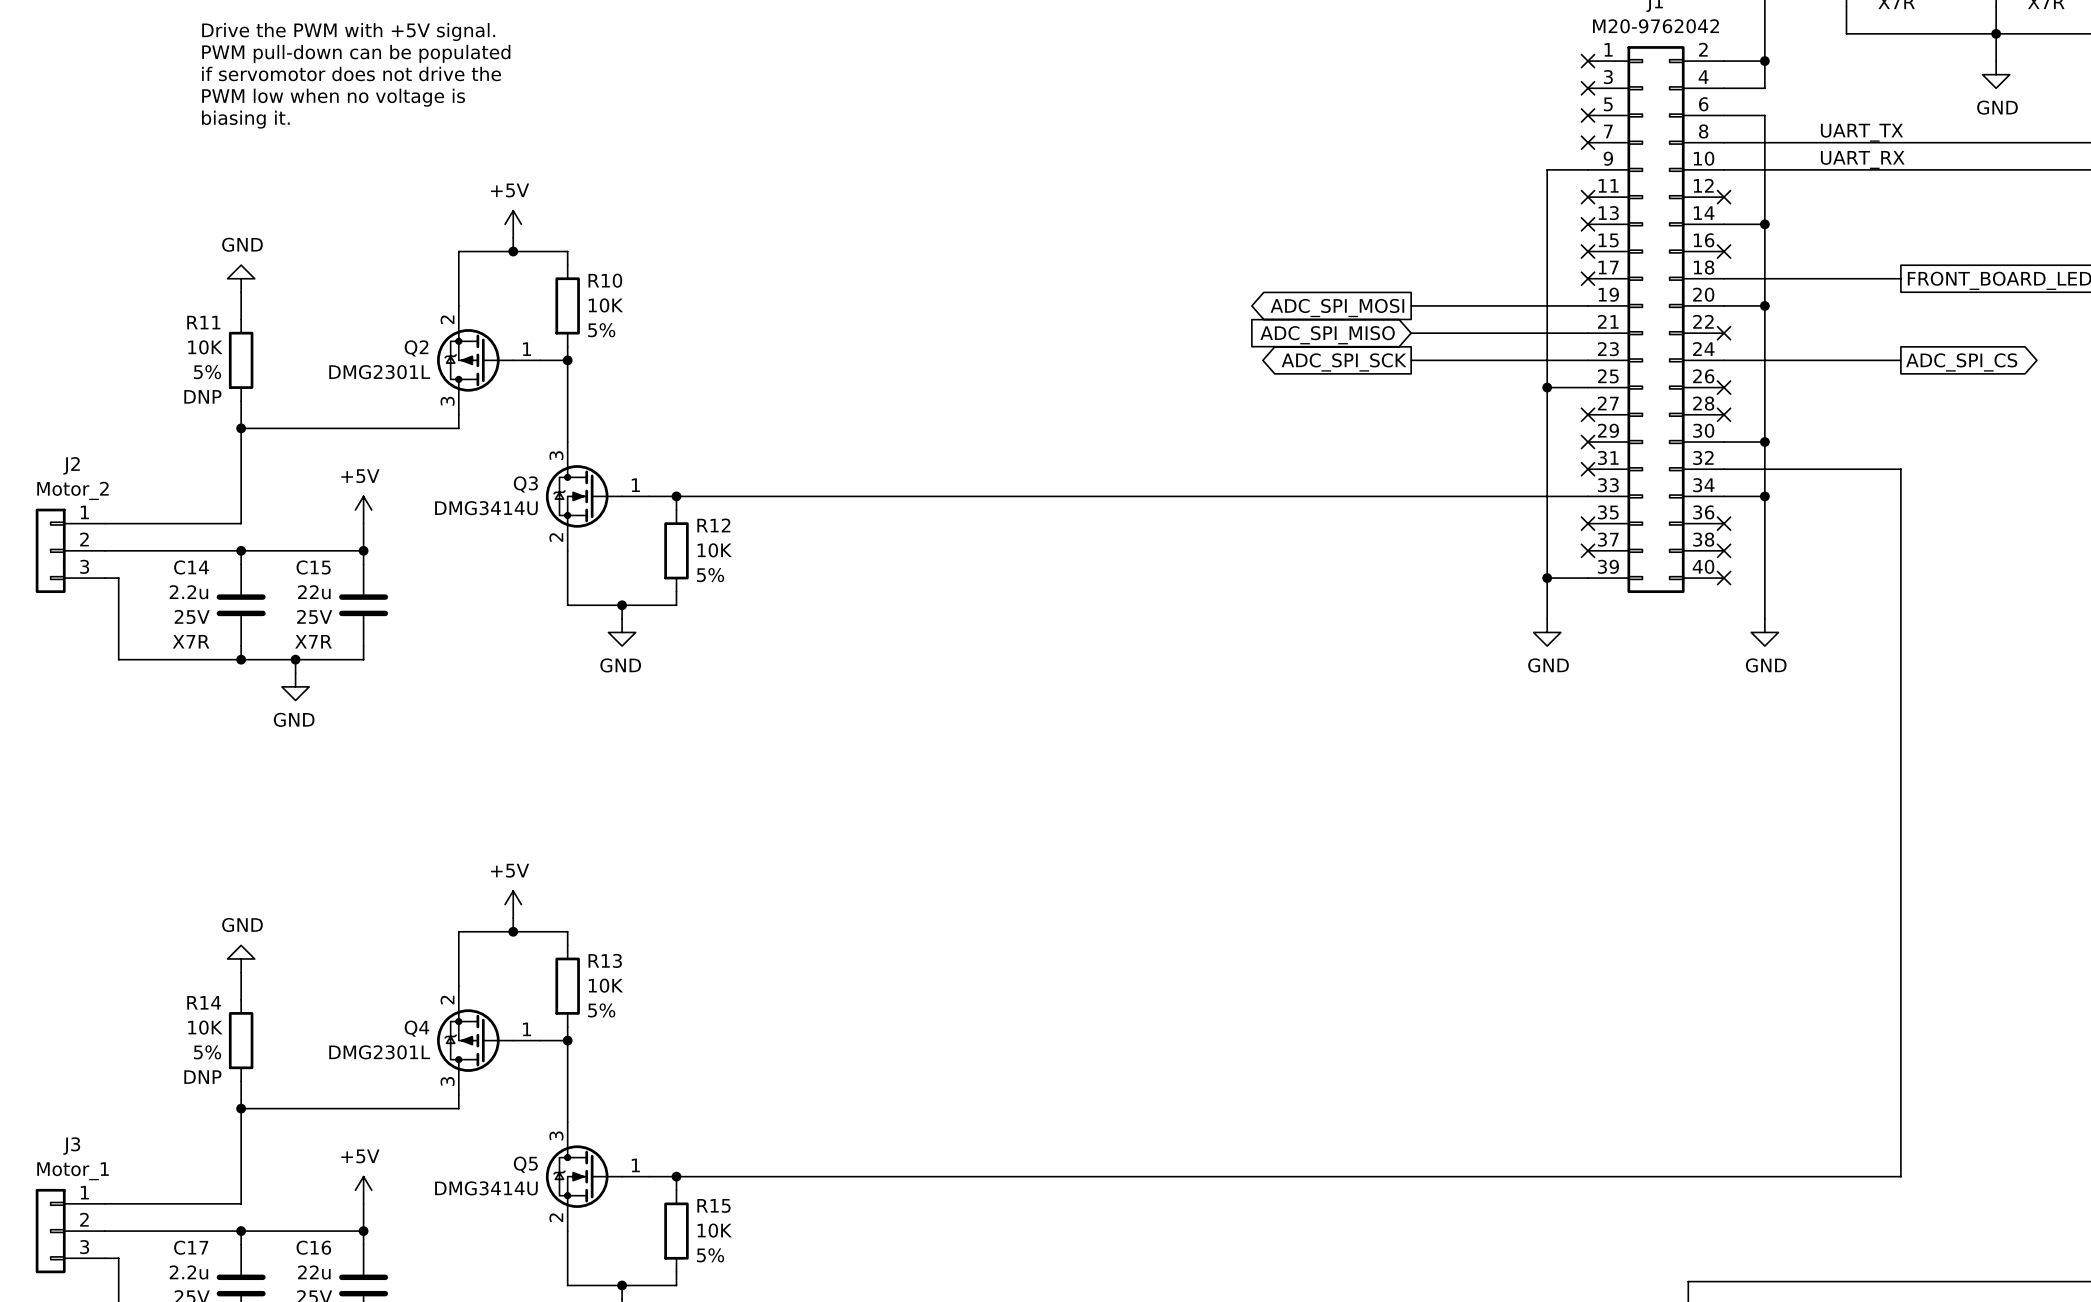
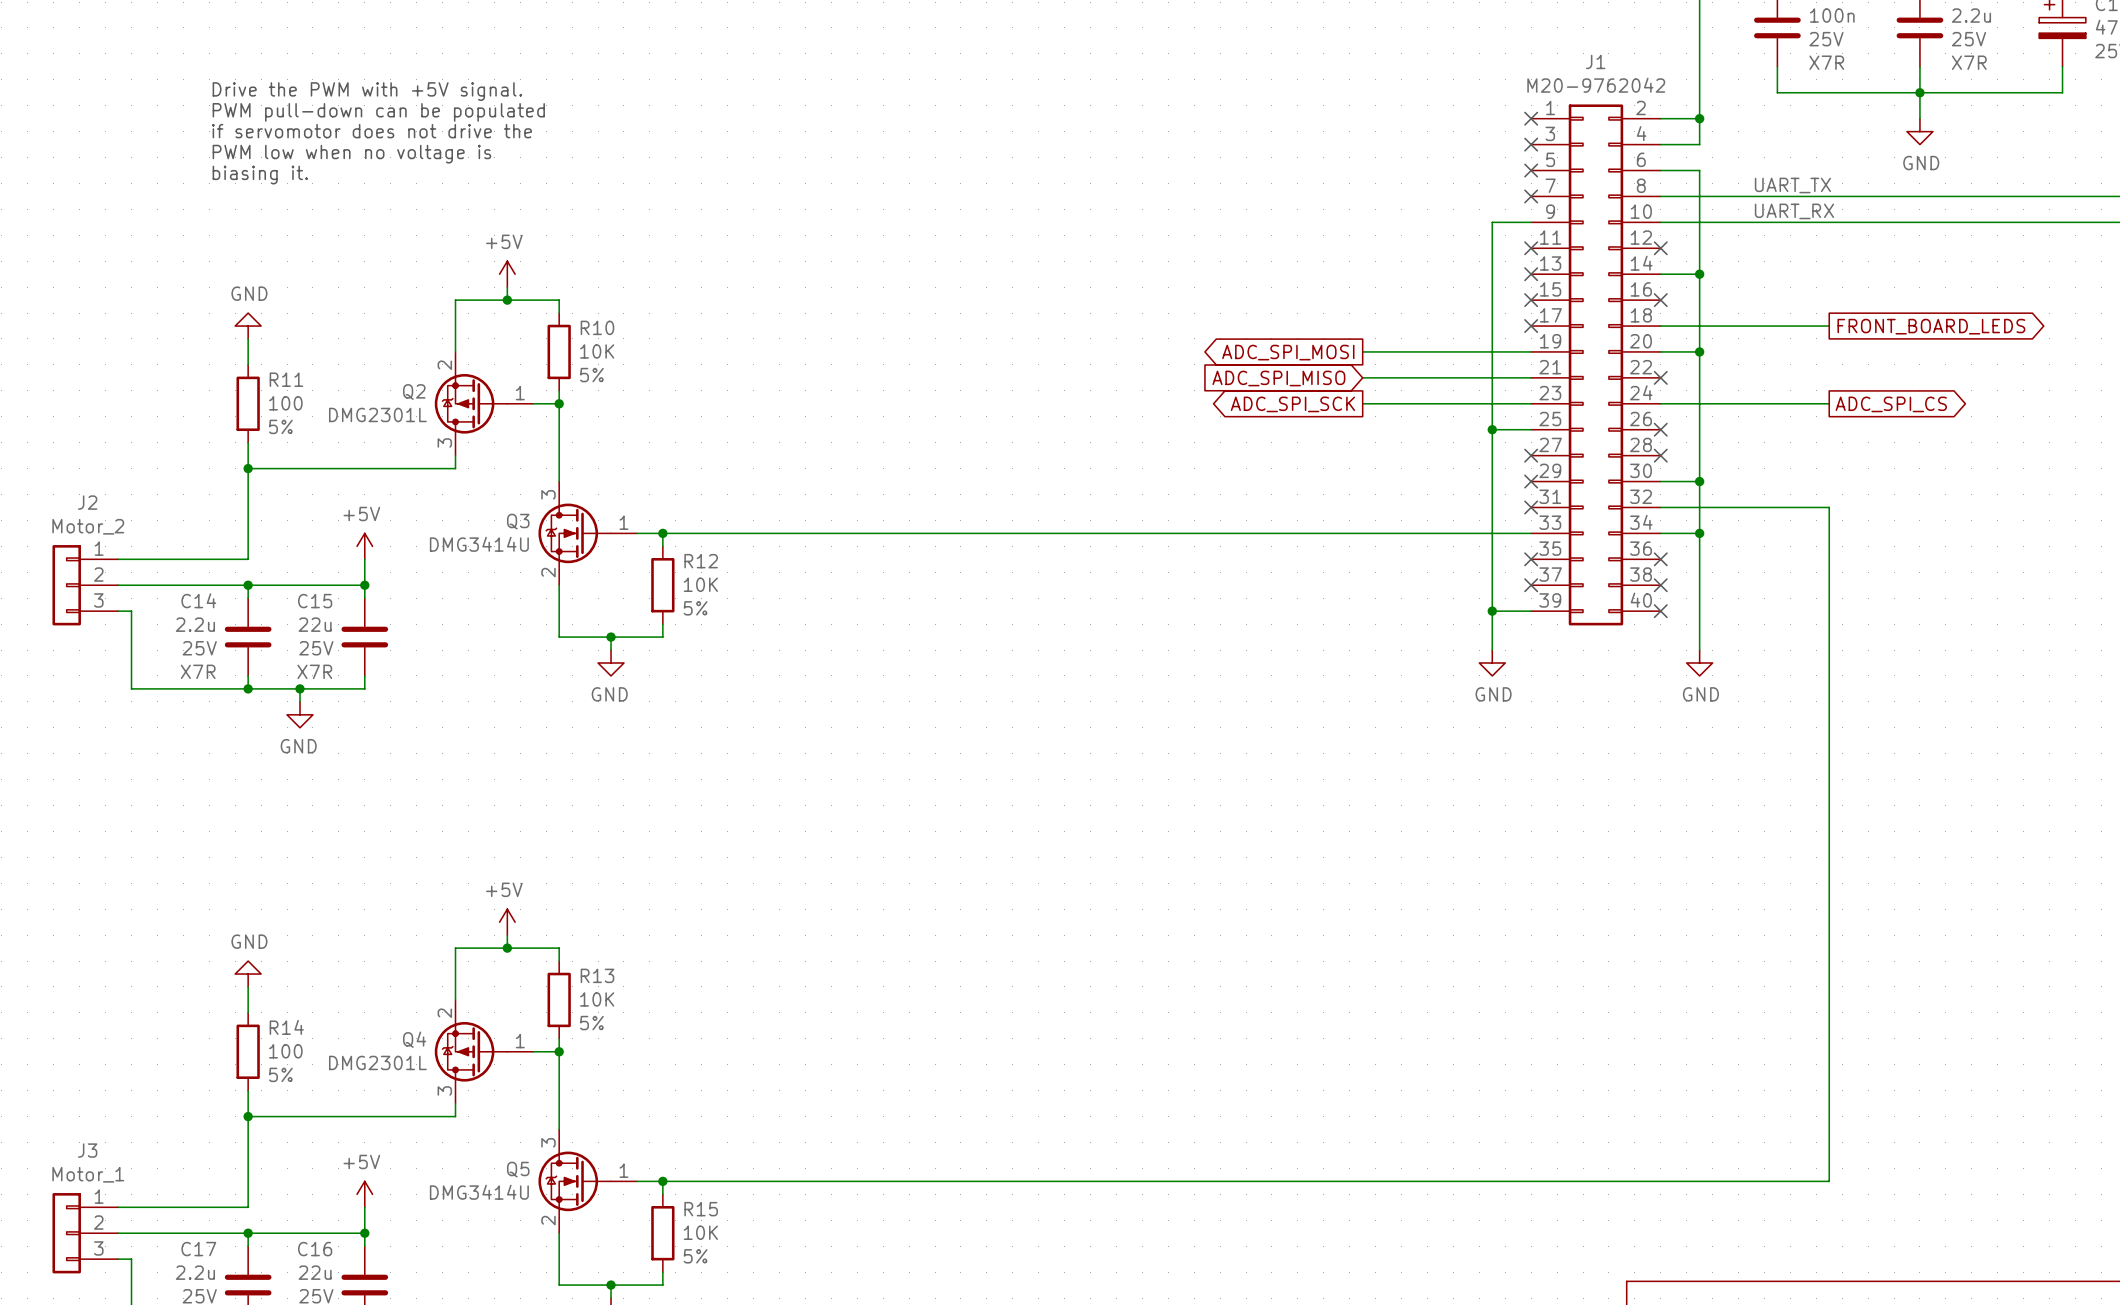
R11 name position: R11 (203, 322) -> R11 (286, 379)
R11 value: 10K (205, 347) -> 100 (285, 403)
R11 text position: 5% (207, 372) -> 5% (280, 426)
R11 text: DNP (202, 396) -> none
R14 name position: R14 (204, 1002) -> R14 (286, 1027)
R14 value: 10K (205, 1027) -> 100 (285, 1051)
R14 text position: 5% (207, 1052) -> 5% (280, 1074)
R14 text: DNP (202, 1077) -> none

